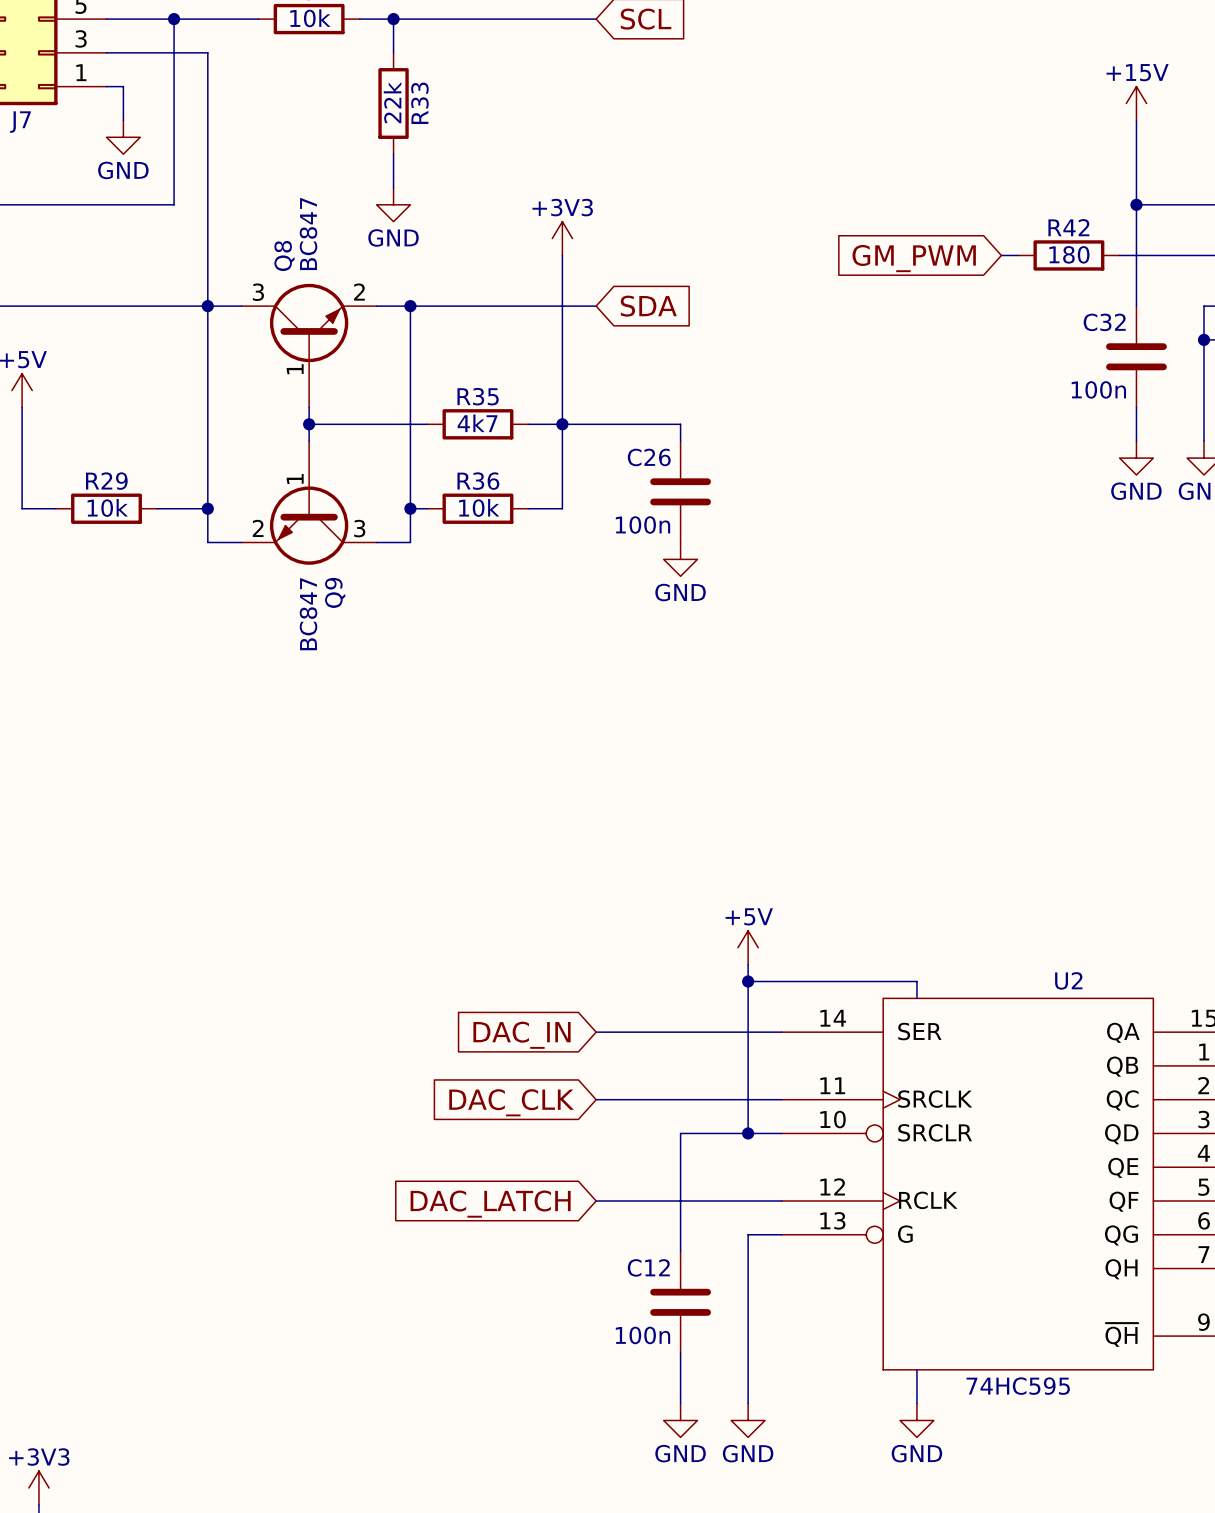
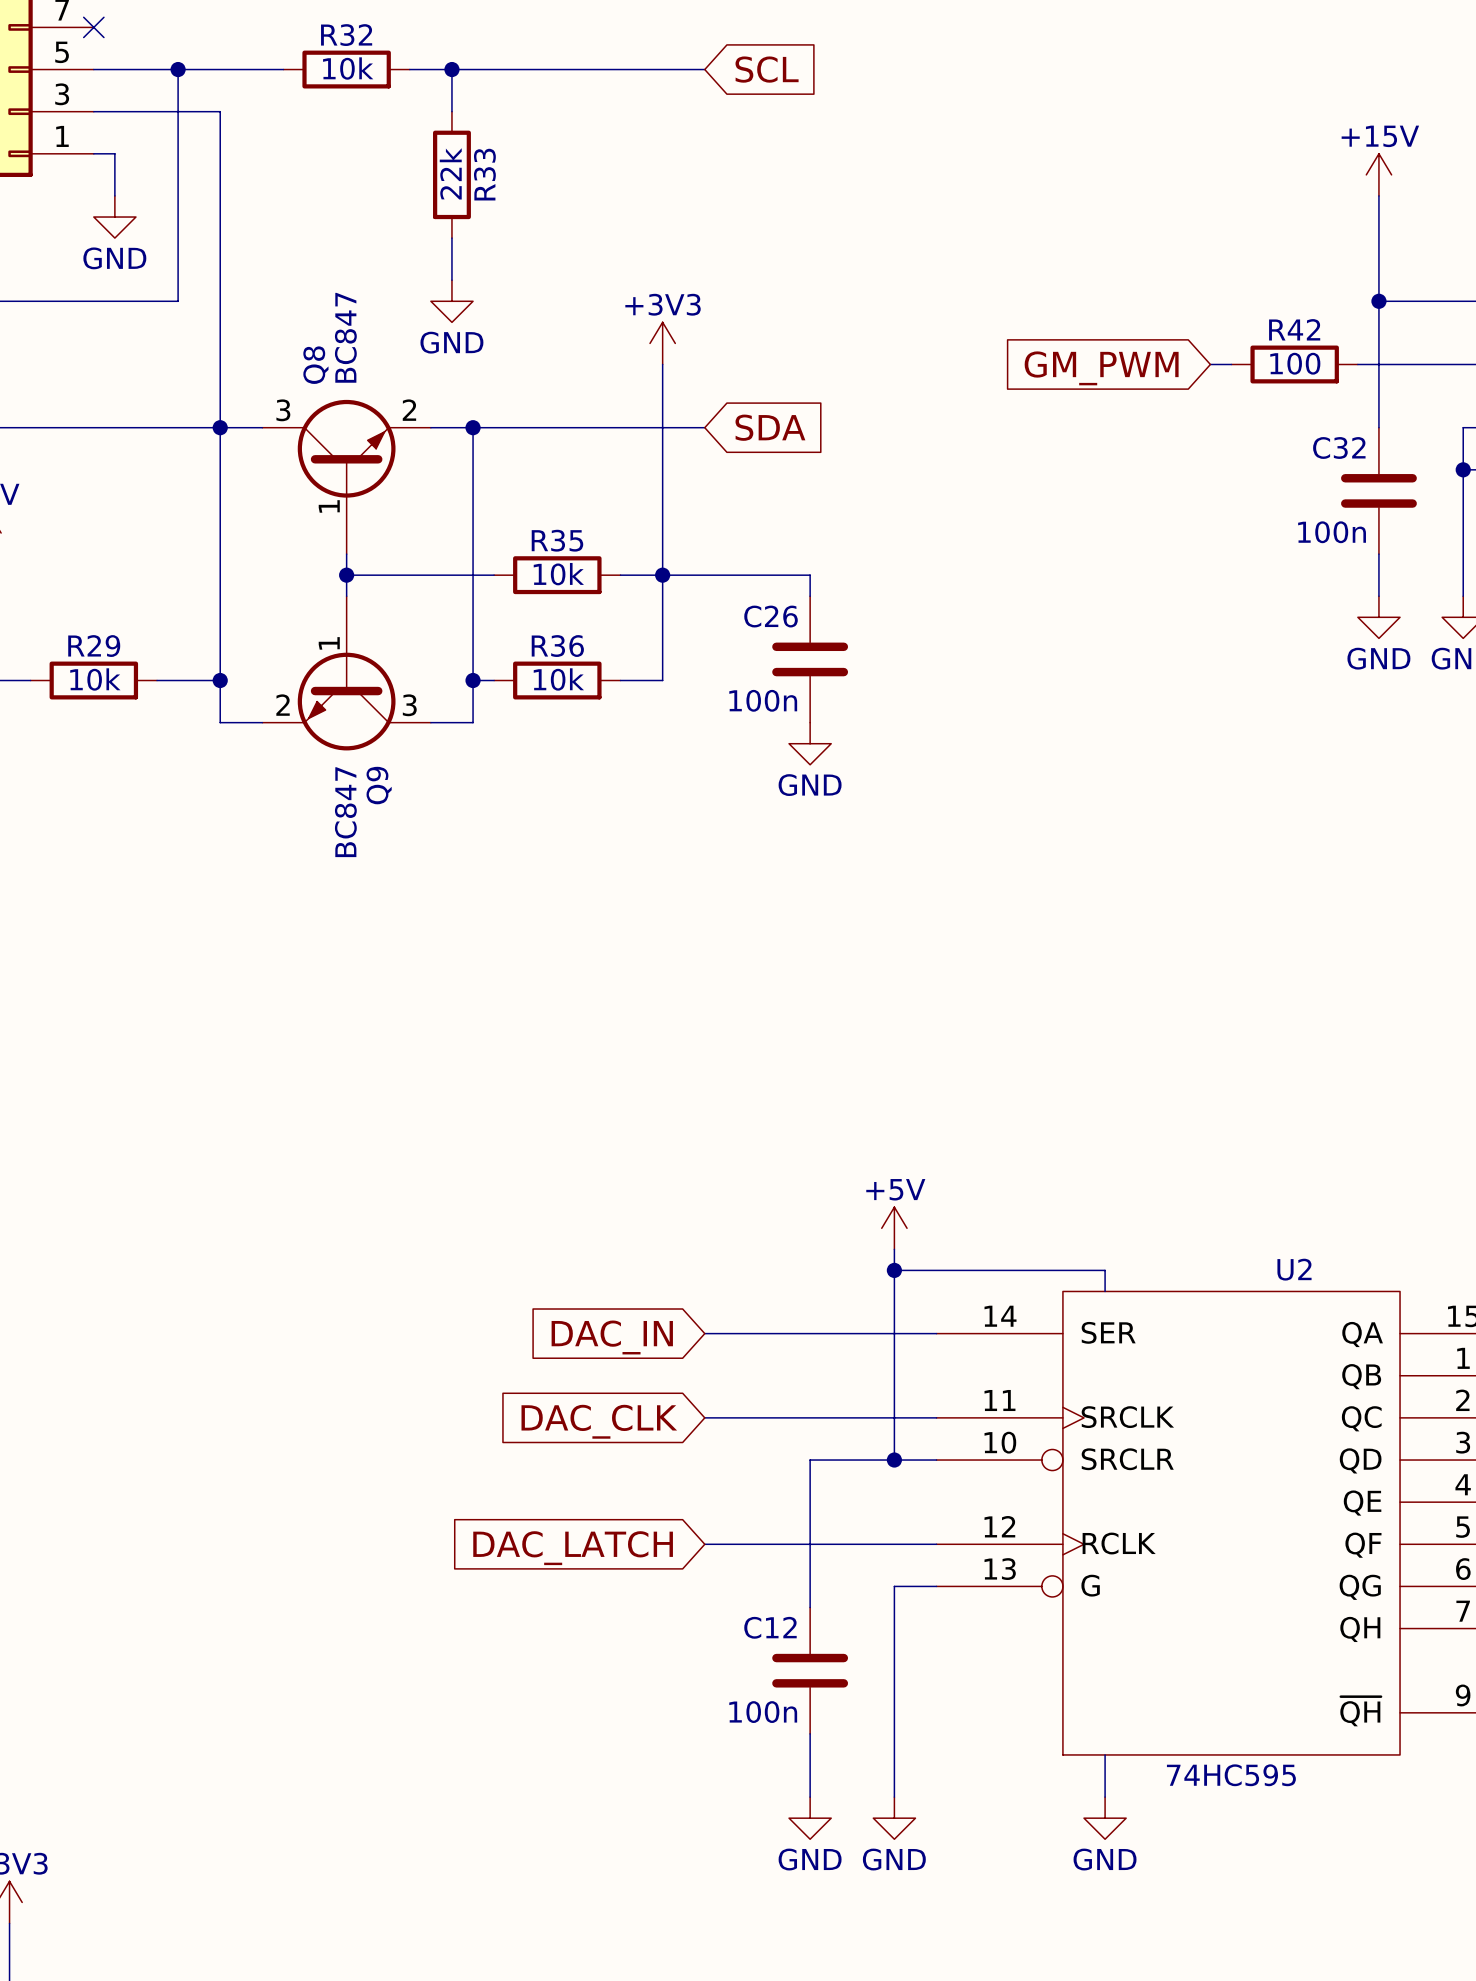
R42 value: 180 (1069, 254) -> 100 (1295, 363)
R35 value: 4k7 (477, 423) -> 10k (558, 574)

